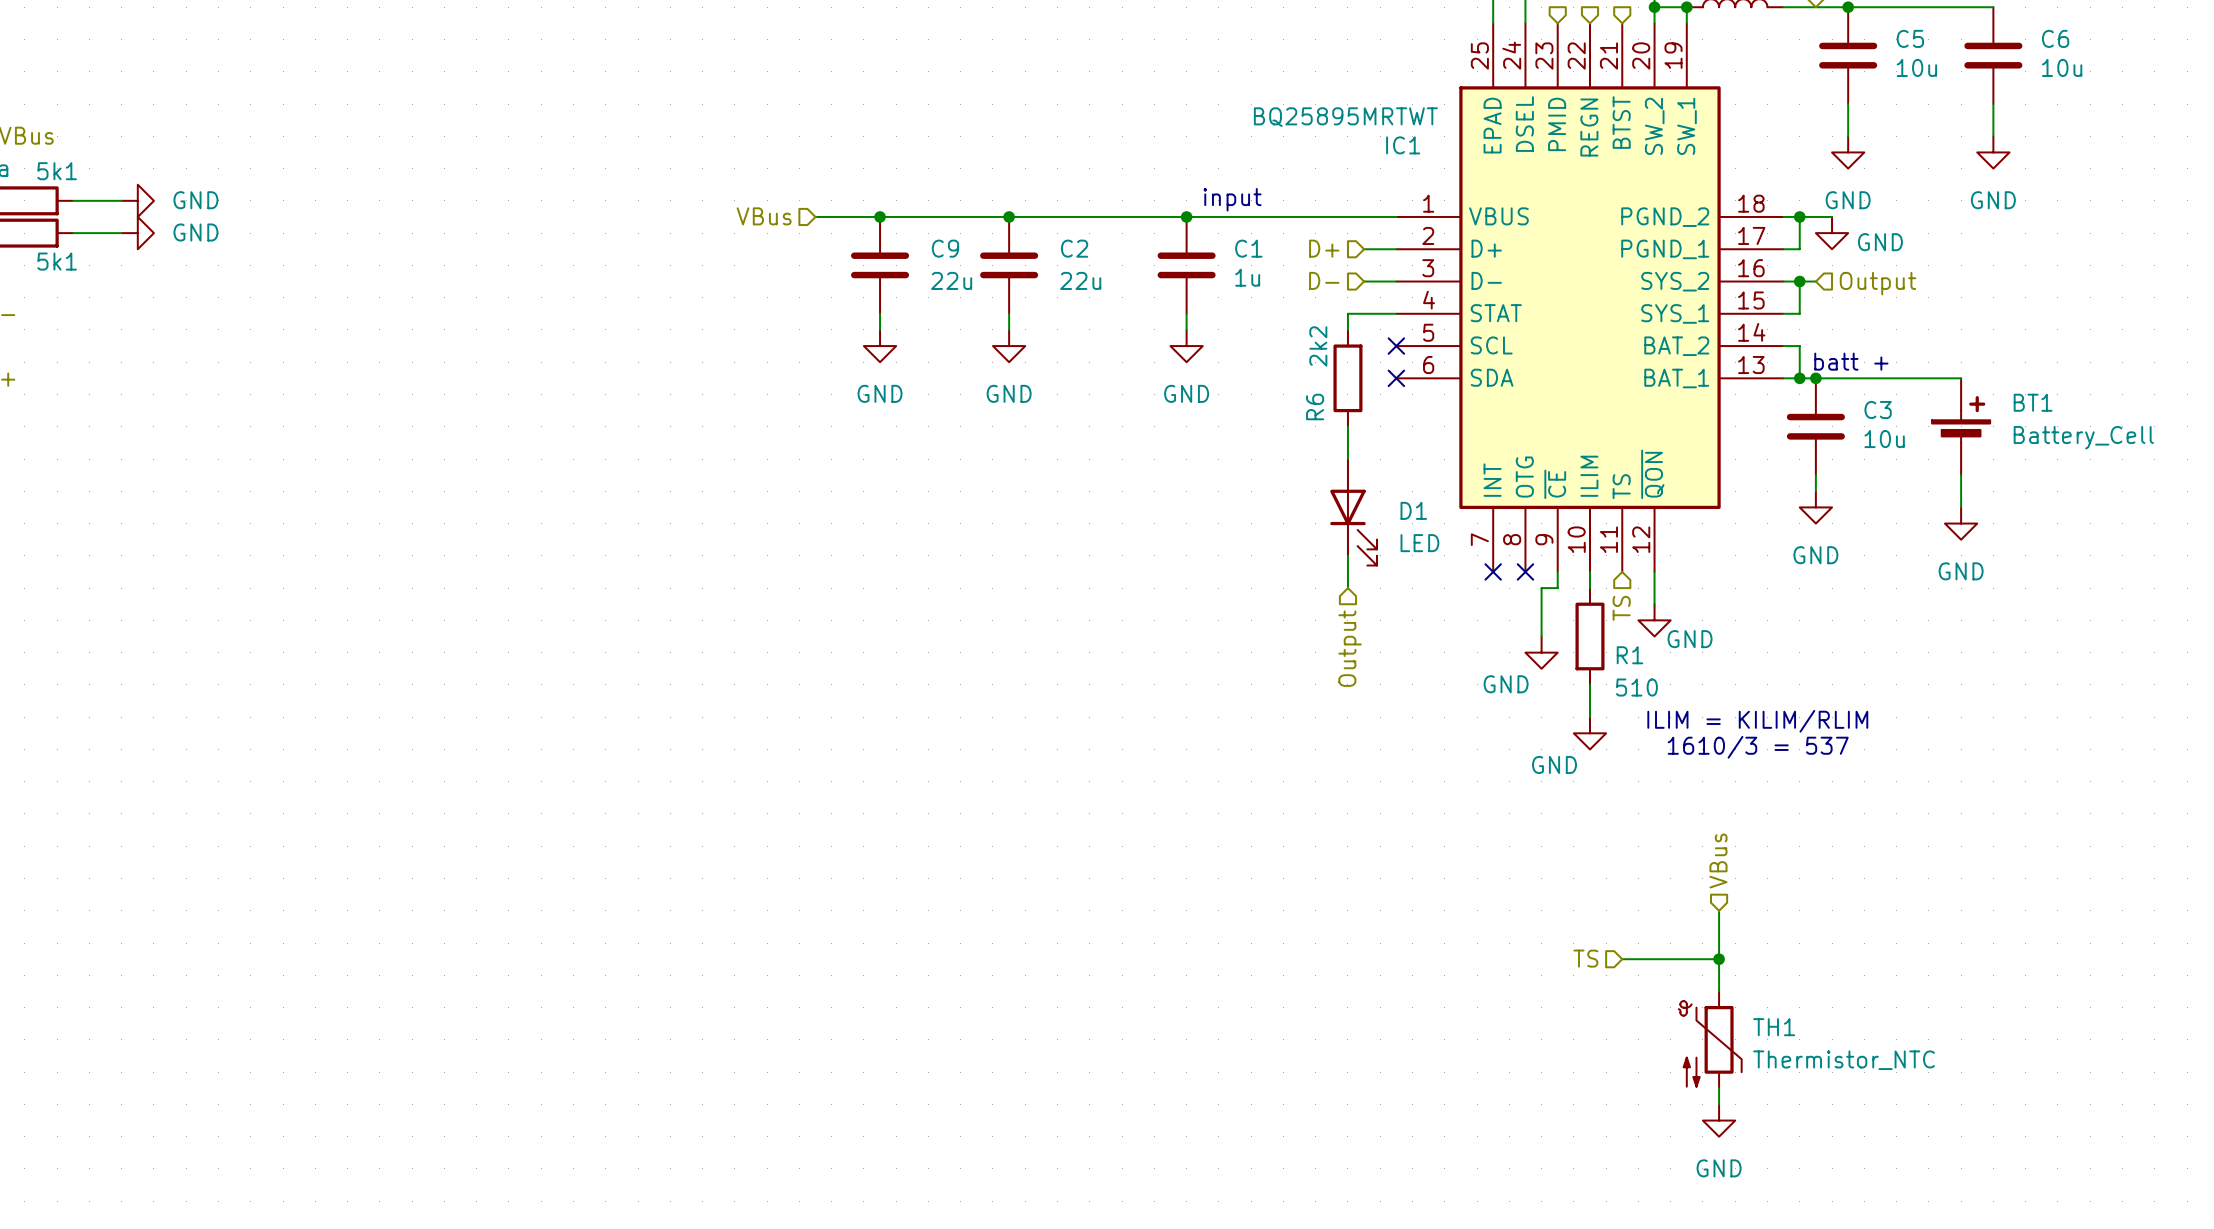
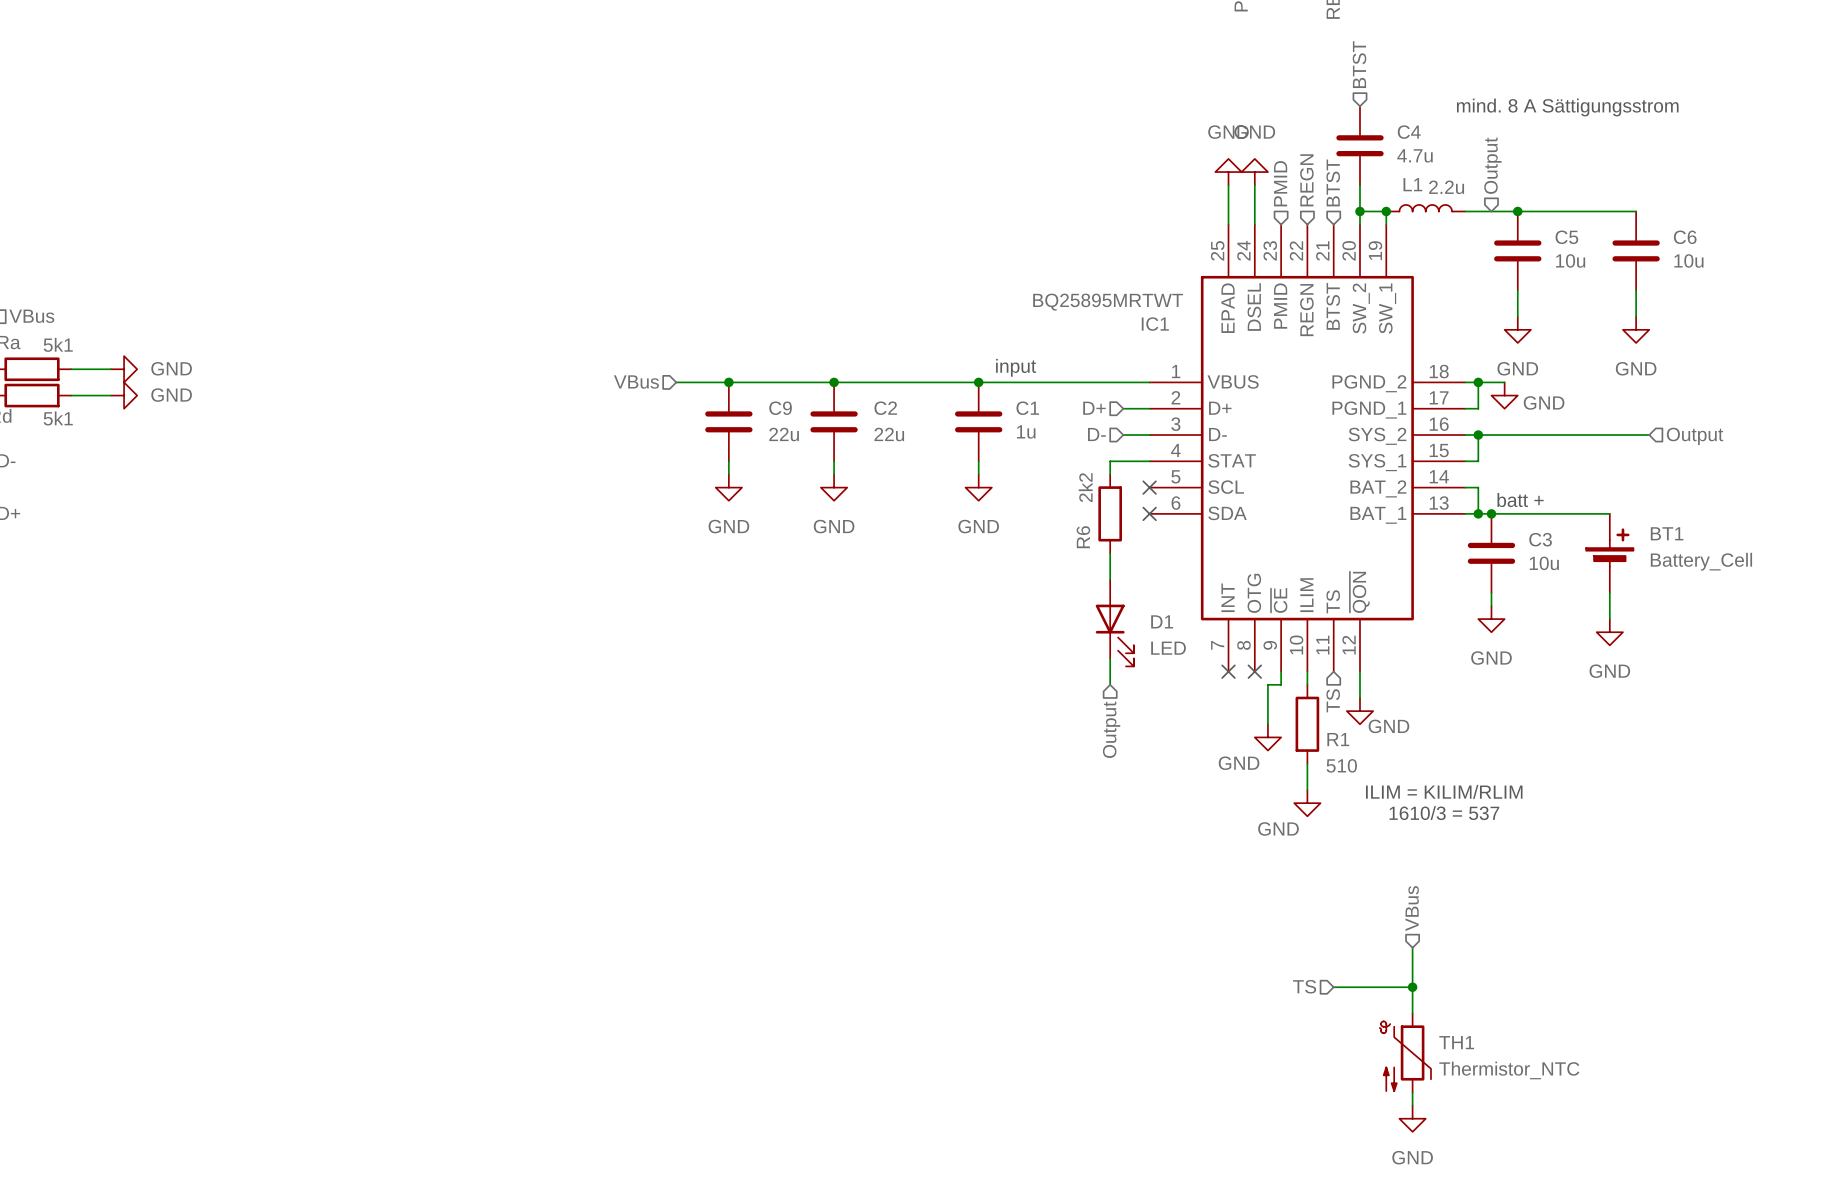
wire: none -> (1491, 435) (1649, 435)
hierarchical label position: Output (1877, 283) -> Output (1695, 436)

